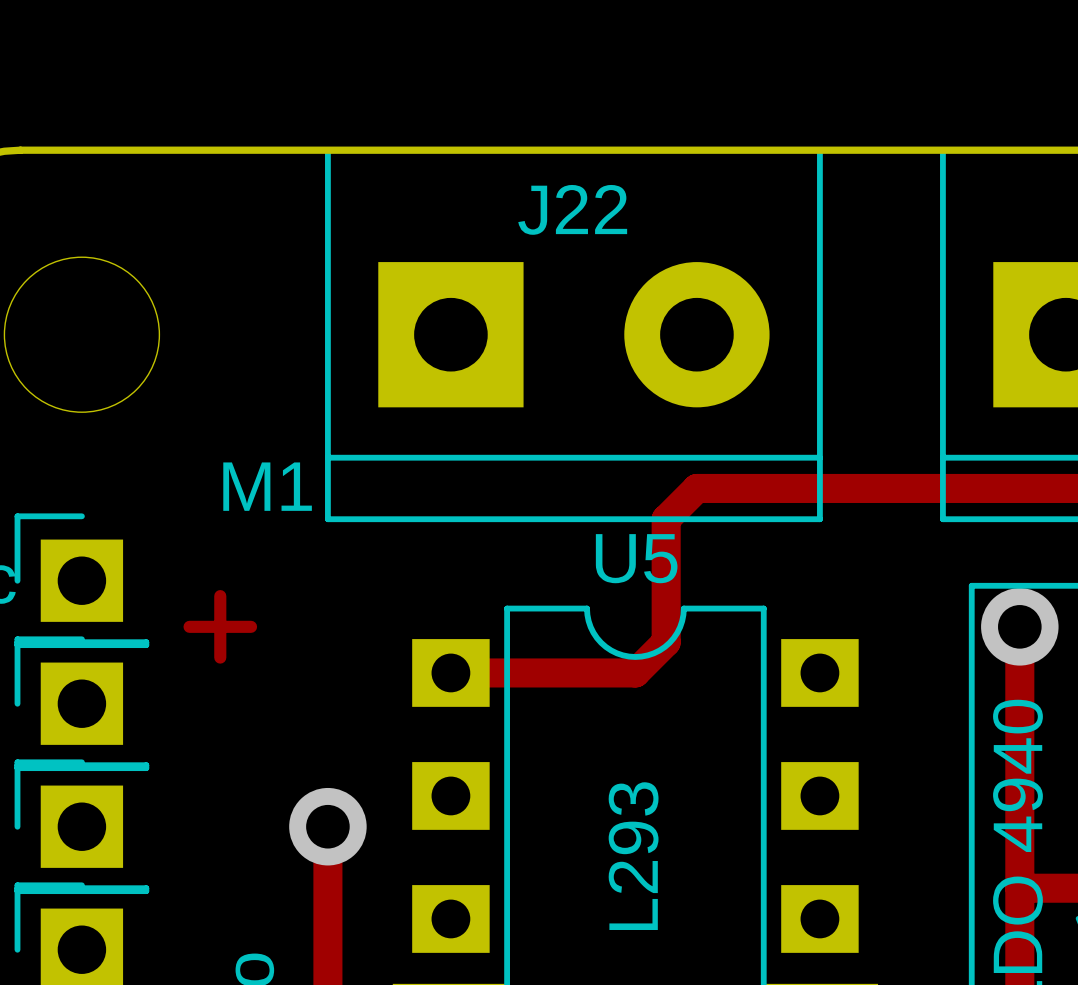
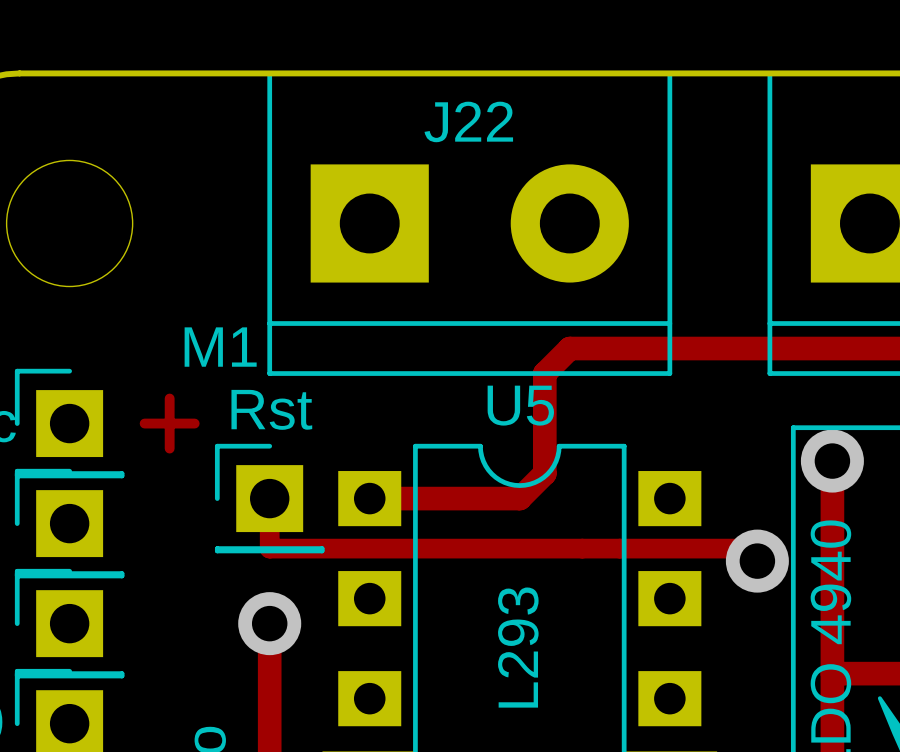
text: none -> Rst (271, 409)
track: (220, 596) (220, 657) -> (169, 398) (169, 448)
track: (189, 626) (251, 626) -> (144, 423) (194, 423)
track: none -> (269, 498) (269, 548) (757, 548) (757, 561)
part: none -> (269, 498)
via: none -> (757, 561)

